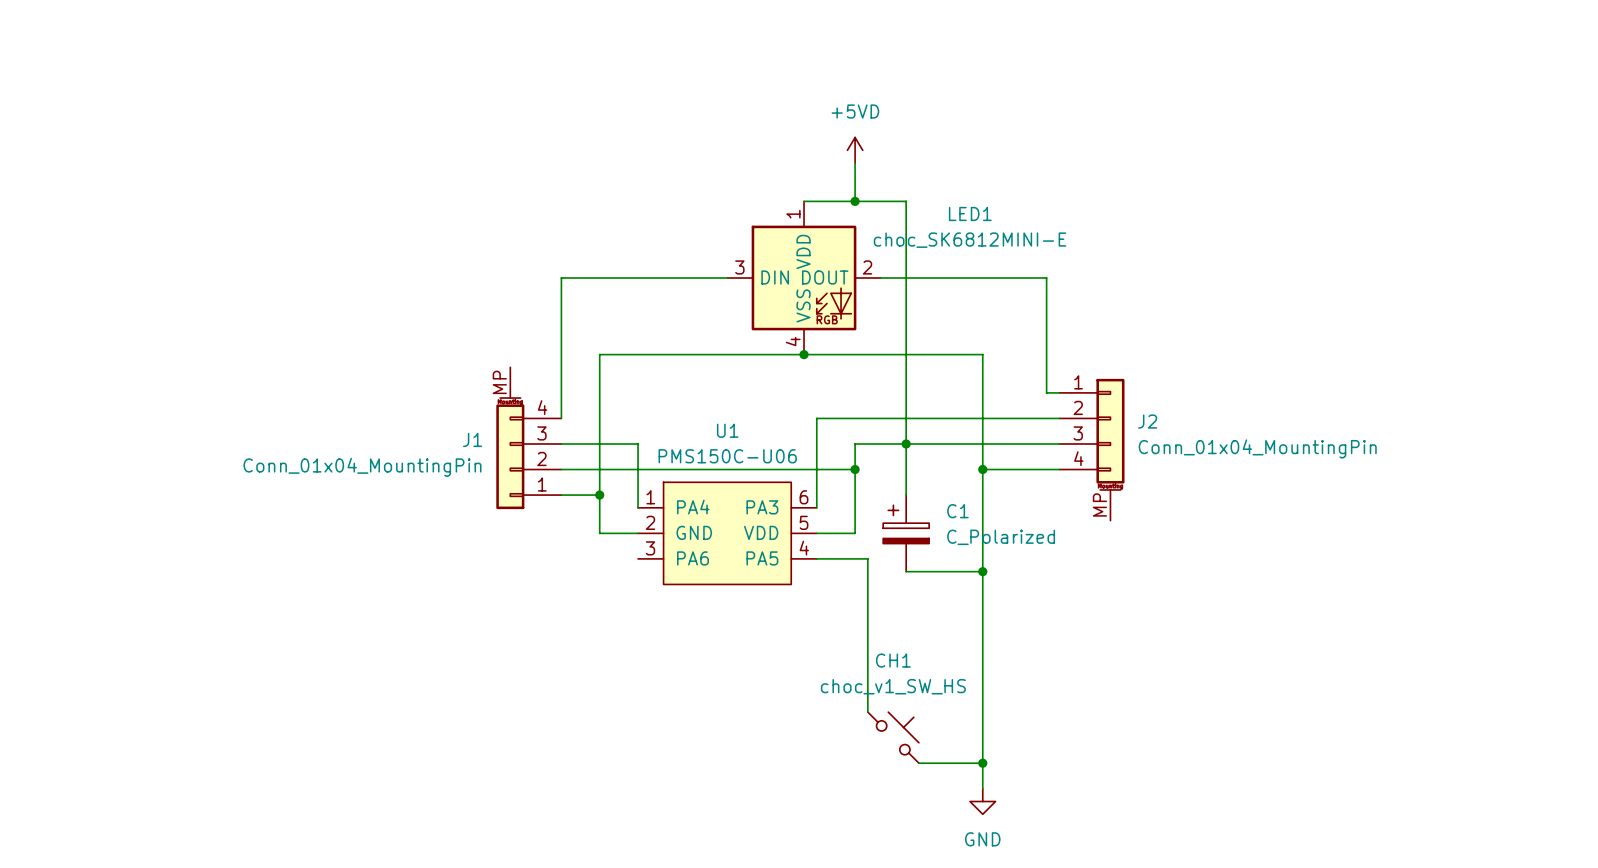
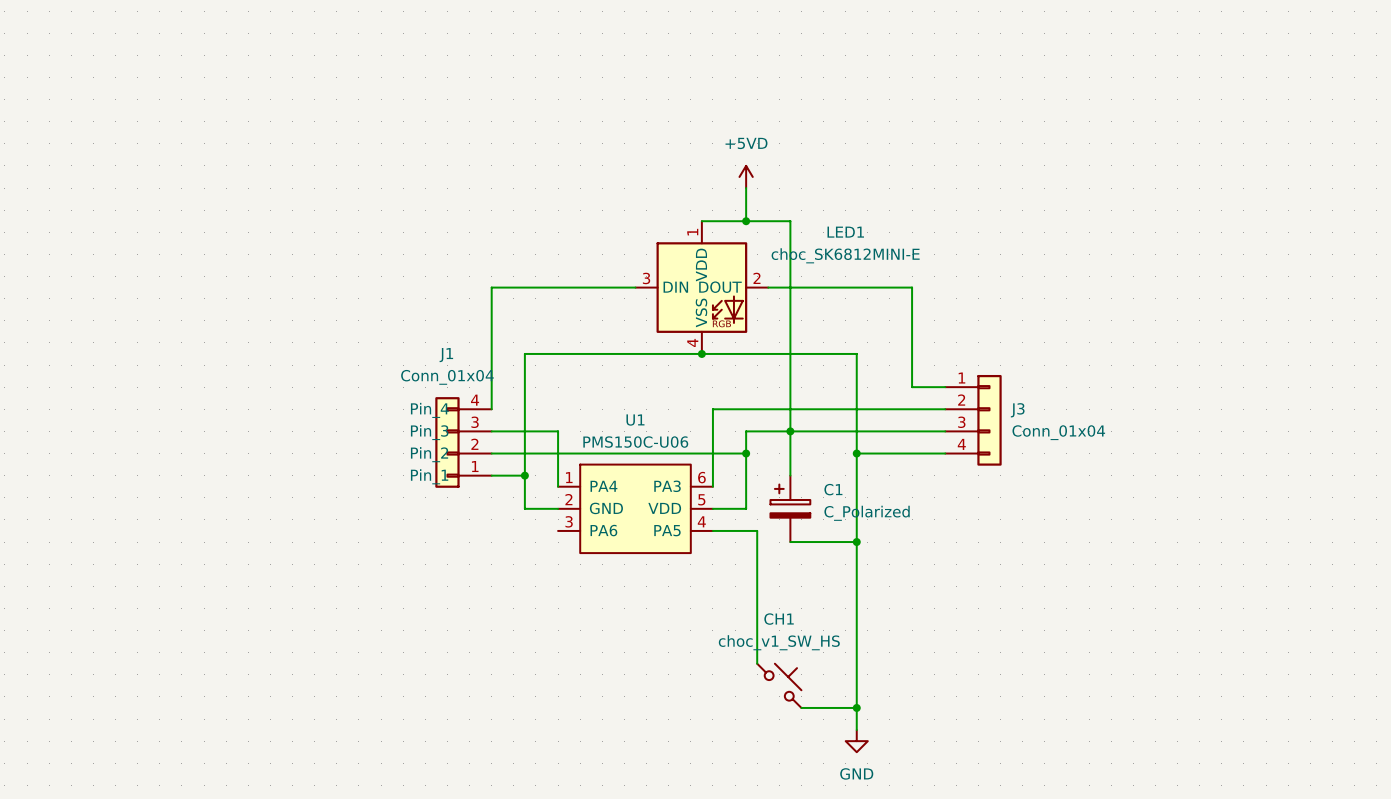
J1 symbol: [496, 367, 562, 510] -> [435, 397, 492, 488]
J3: none -> Conn_01x04 (973, 420)
J1 name position: J1 (472, 439) -> J1 (446, 355)
J2: Conn_01x04_MountingPin (1091, 449) -> none
J1 value: Conn_01x04_MountingPin (362, 467) -> Conn_01x04 (447, 377)

